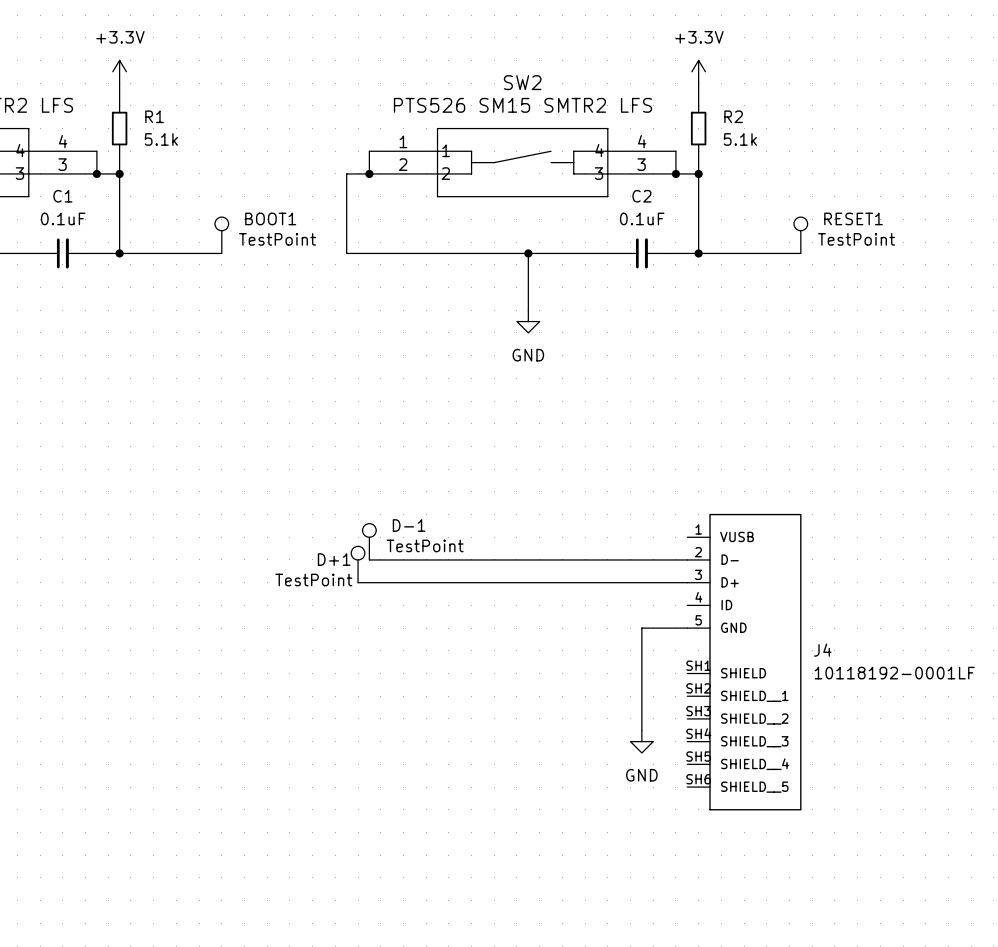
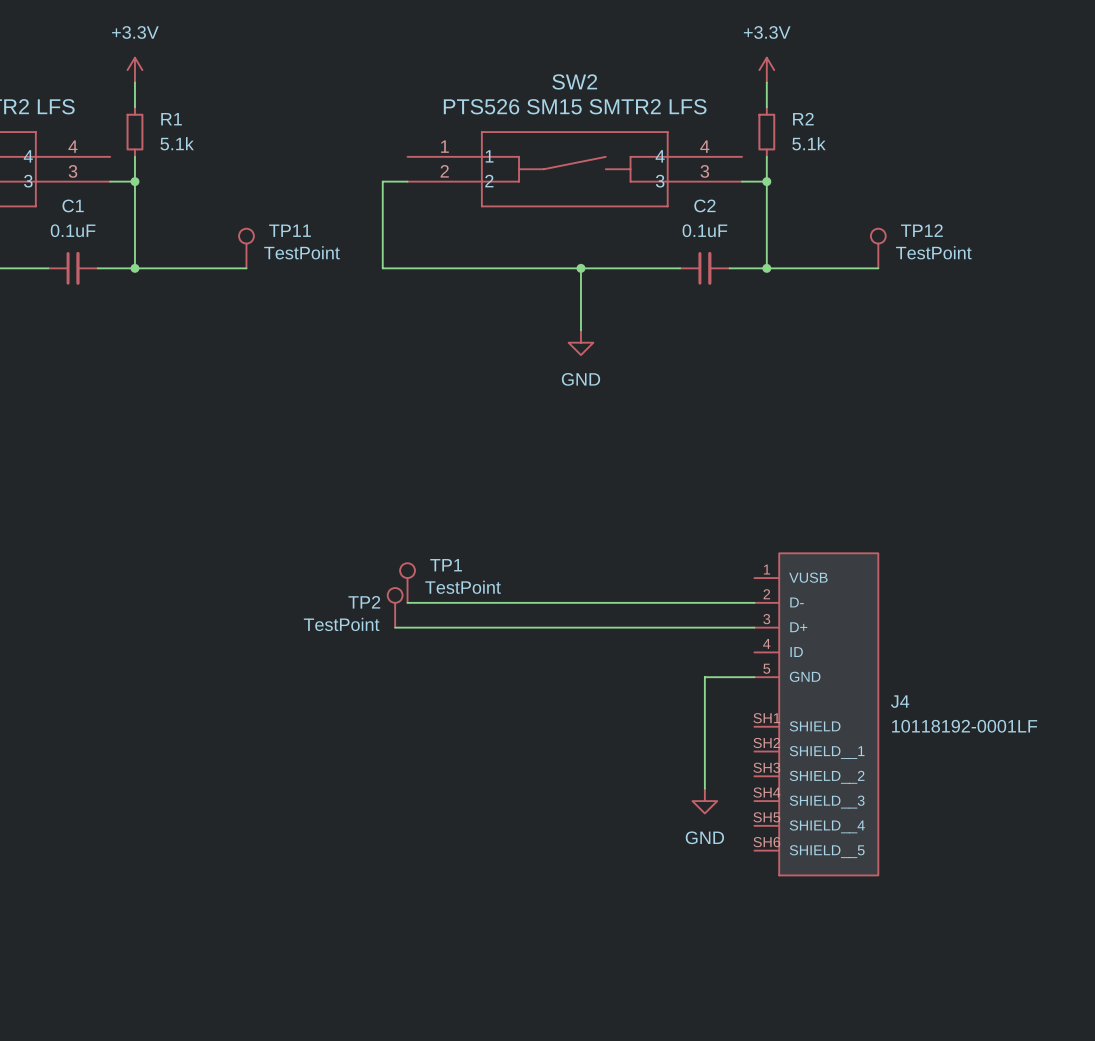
wire: (96, 151) (96, 173) -> none
wire: (369, 151) (369, 173) -> none
wire: (675, 151) (675, 173) -> none
junction: (96, 173) -> none
junction: (369, 173) -> none
junction: (675, 173) -> none
BOOT1 name: BOOT1 (270, 218) -> TP11 (290, 230)
RESET1 name: RESET1 (853, 218) -> TP12 (921, 230)
D-1 name: D-1 (409, 525) -> TP1 (446, 565)
D+1 name: D+1 (334, 559) -> TP2 (364, 602)

